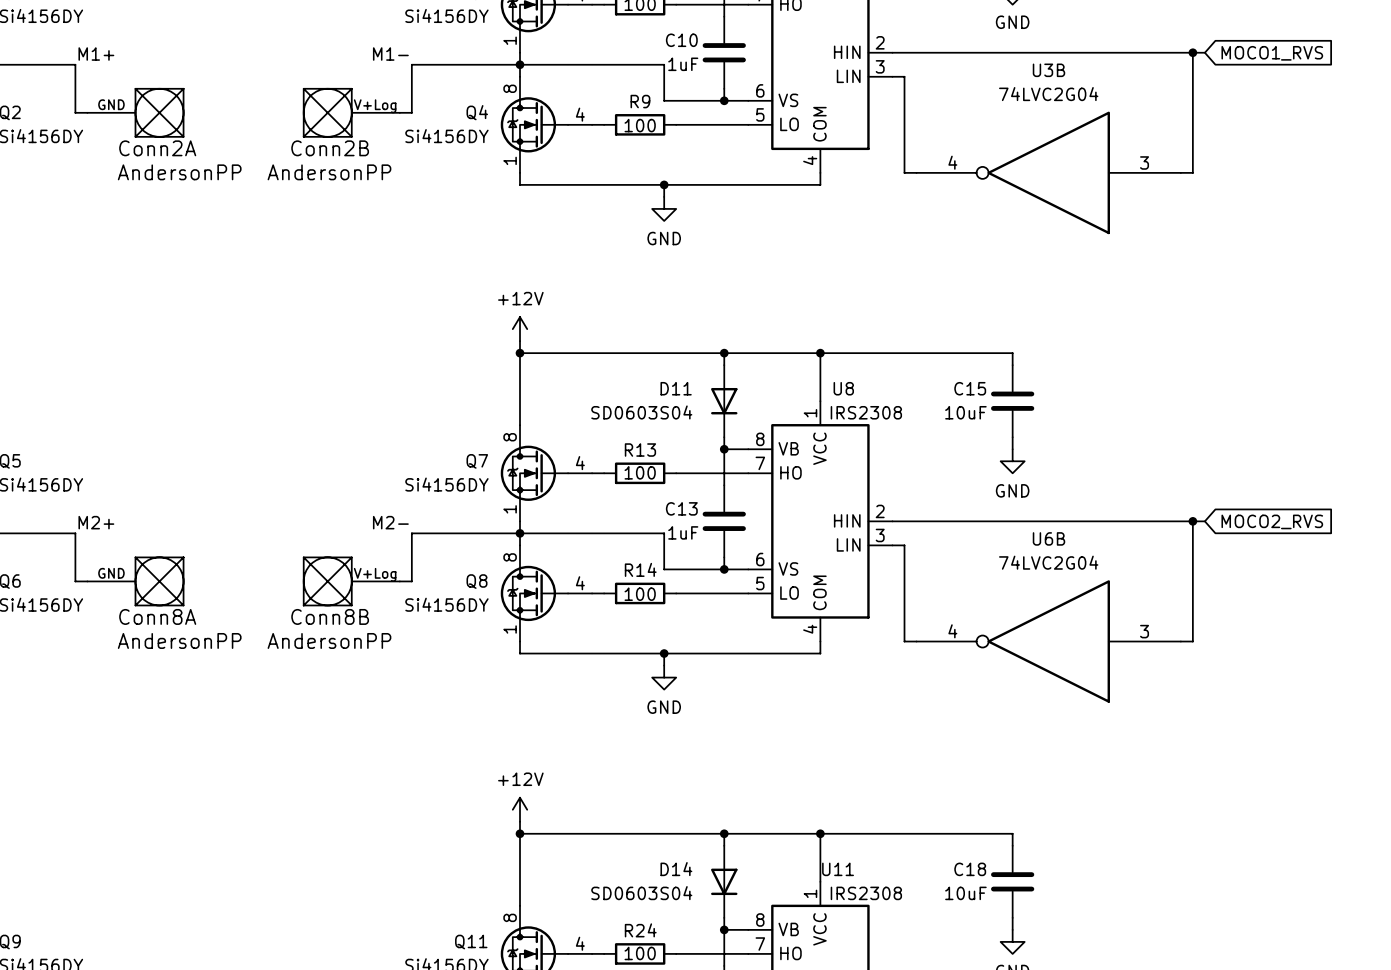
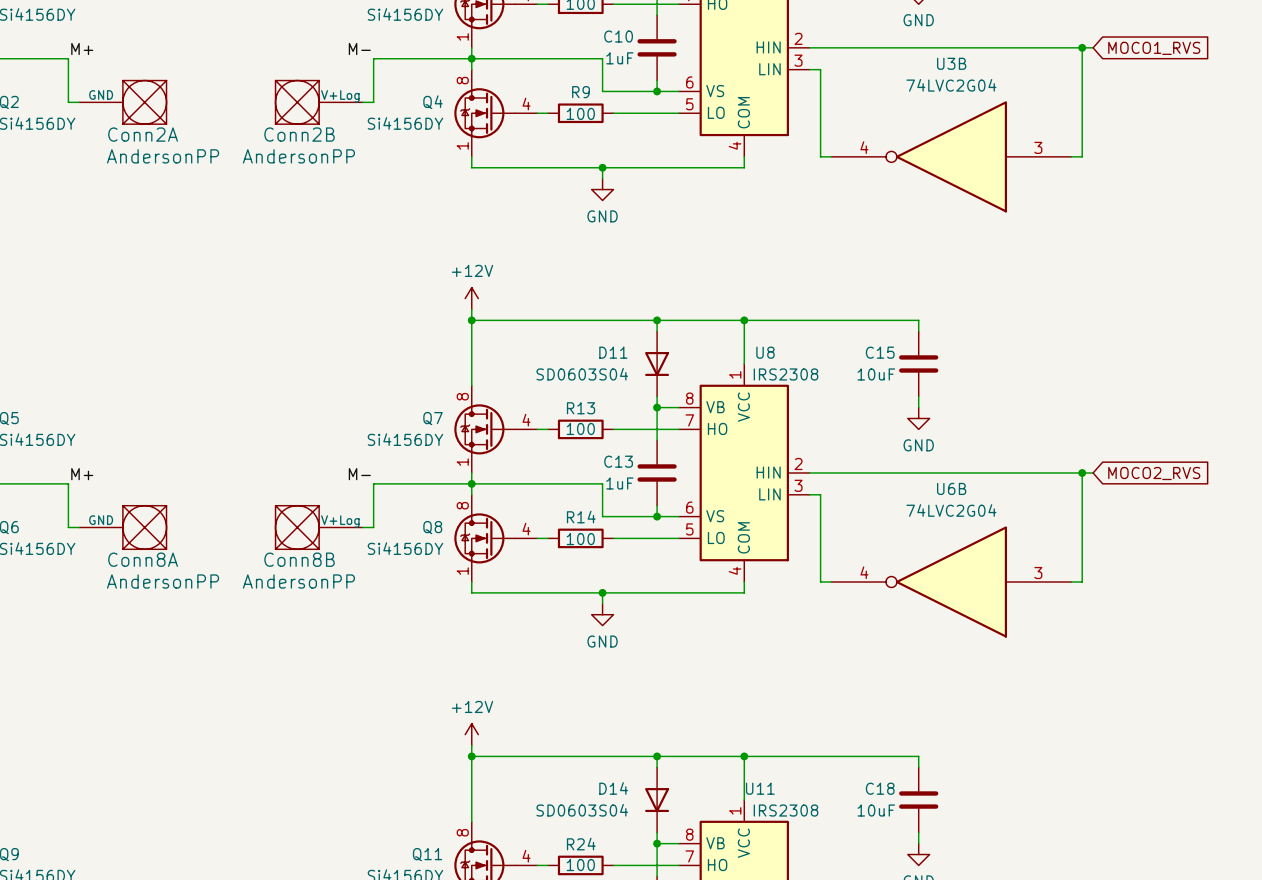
label: M1+ (96, 54) -> M+ (82, 49)
label: M1- (390, 54) -> M- (359, 49)
label: M2+ (96, 522) -> M+ (82, 474)
label: M2- (390, 522) -> M- (359, 474)

